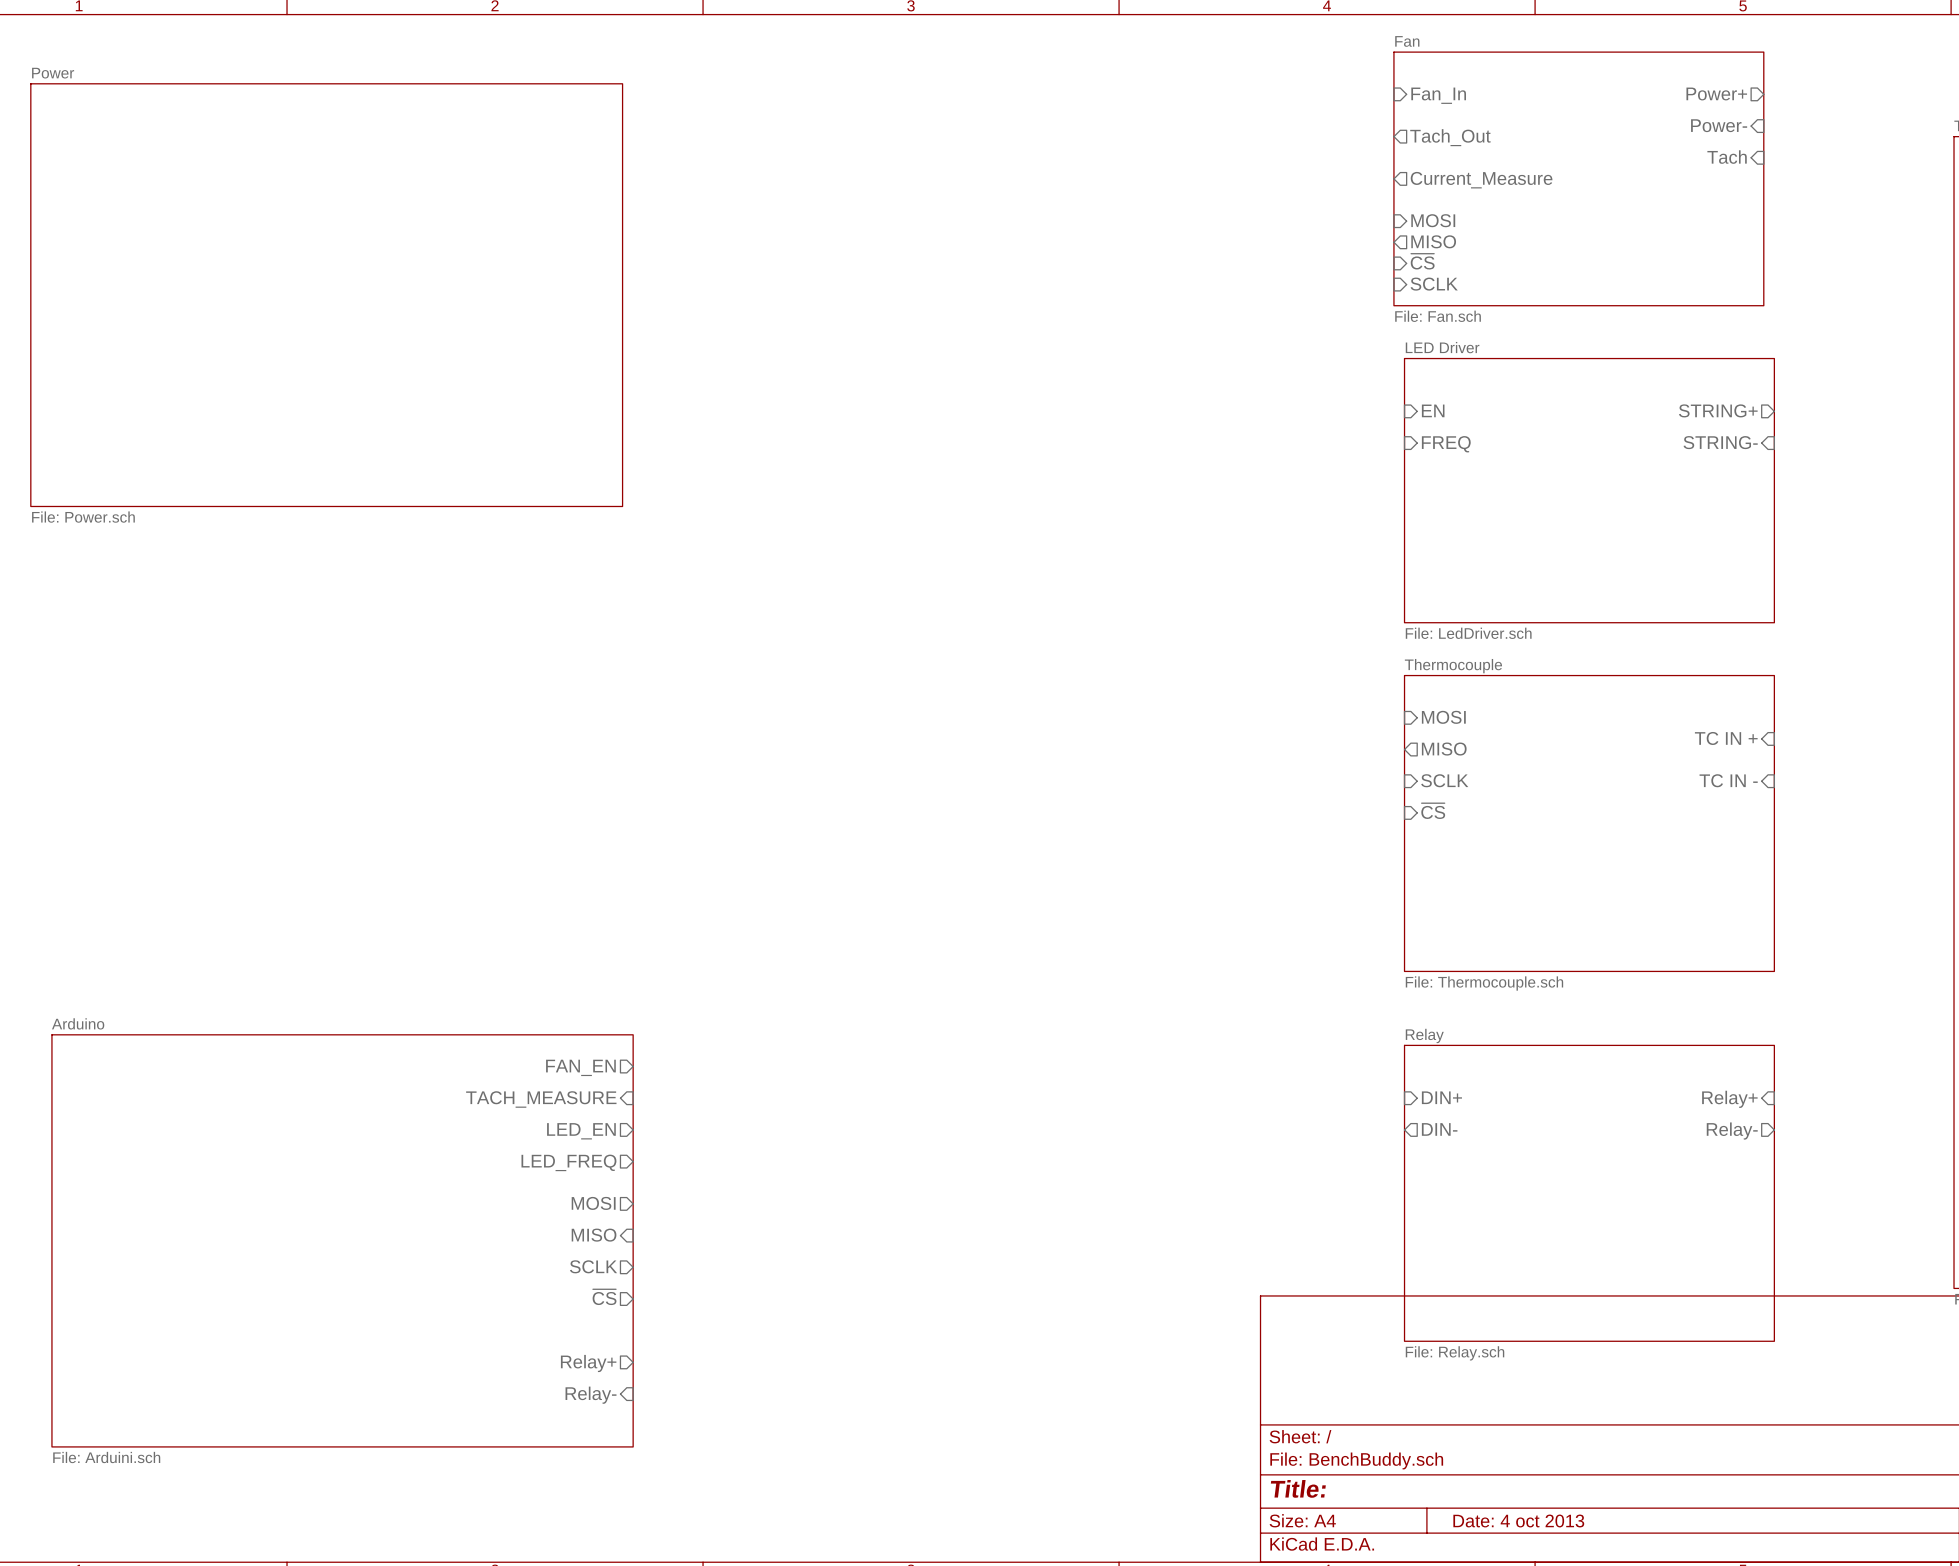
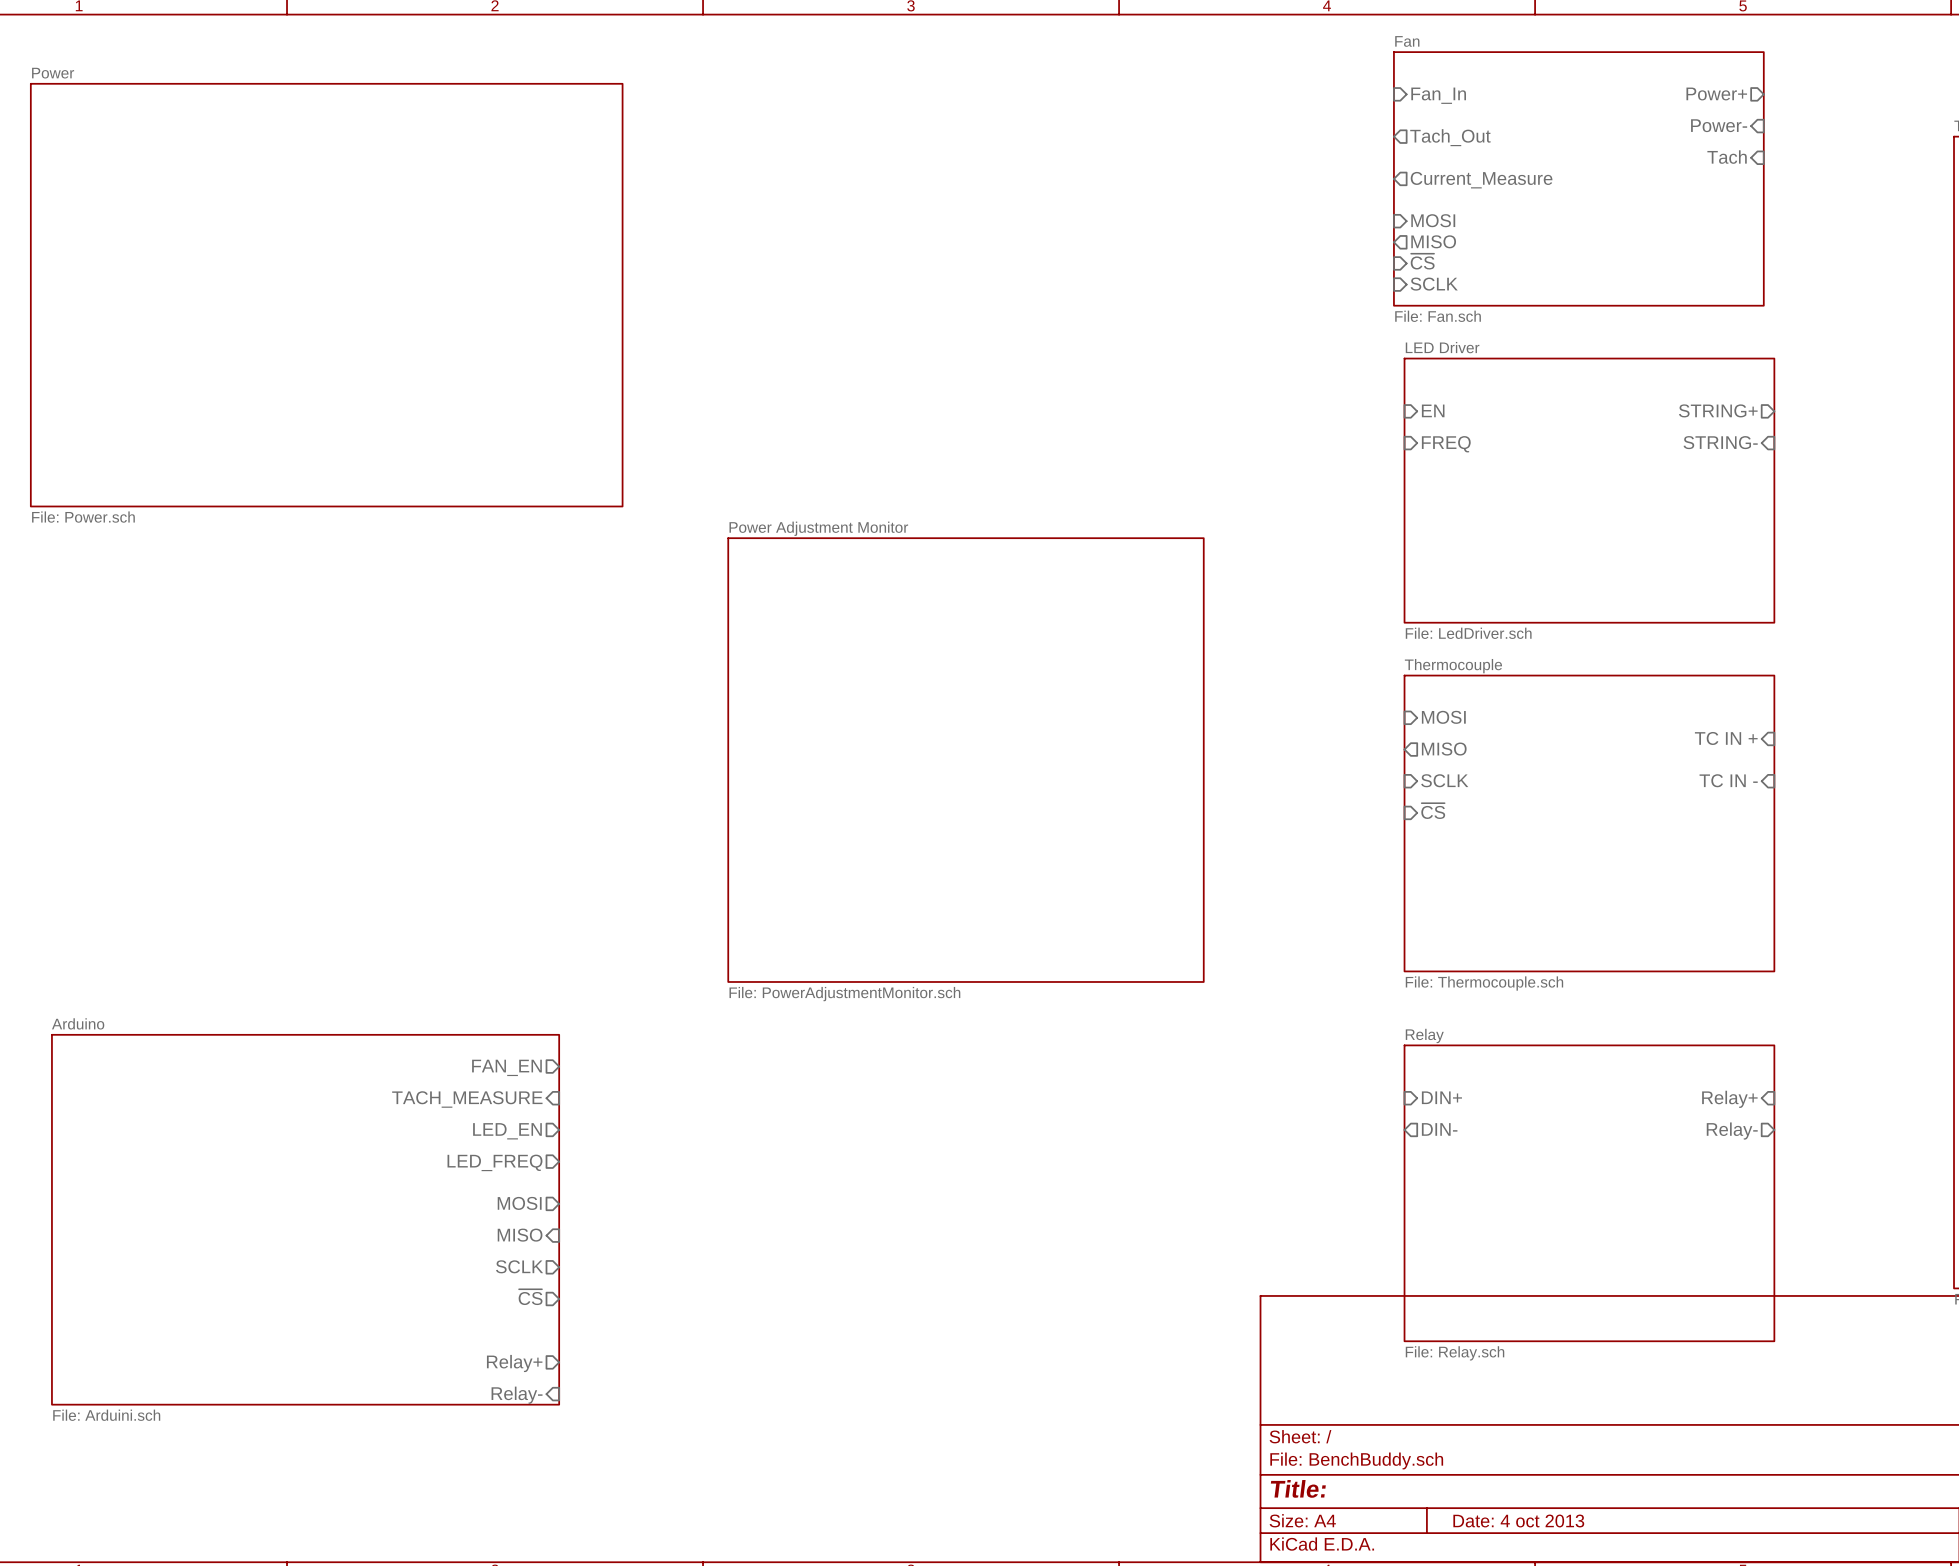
sheet Power Adjustment Monitor: none -> File: PowerAdjustmentMonitor.sch (966, 760)
sheet pin position: FAN_EN (580, 1067) -> FAN_EN (506, 1067)
sheet pin position: TACH_MEASURE (541, 1099) -> TACH_MEASURE (467, 1099)
sheet pin position: LED_EN (581, 1131) -> LED_EN (507, 1131)
sheet pin position: LED_FREQ (568, 1162) -> LED_FREQ (494, 1162)
sheet pin position: MOSI (593, 1203) -> MOSI (519, 1203)
sheet Arduino: none -> File: Arduini.sch (305, 1219)
sheet pin position: MISO (594, 1235) -> MISO (520, 1235)
sheet Arduino: File: Arduini.sch (342, 1240) -> none
sheet pin position: SCLK (593, 1266) -> SCLK (519, 1266)
sheet pin position: ~{CS} (604, 1297) -> ~{CS} (530, 1297)
sheet pin position: Relay+ (588, 1363) -> Relay+ (514, 1363)
sheet pin position: Relay- (591, 1395) -> Relay- (517, 1395)

